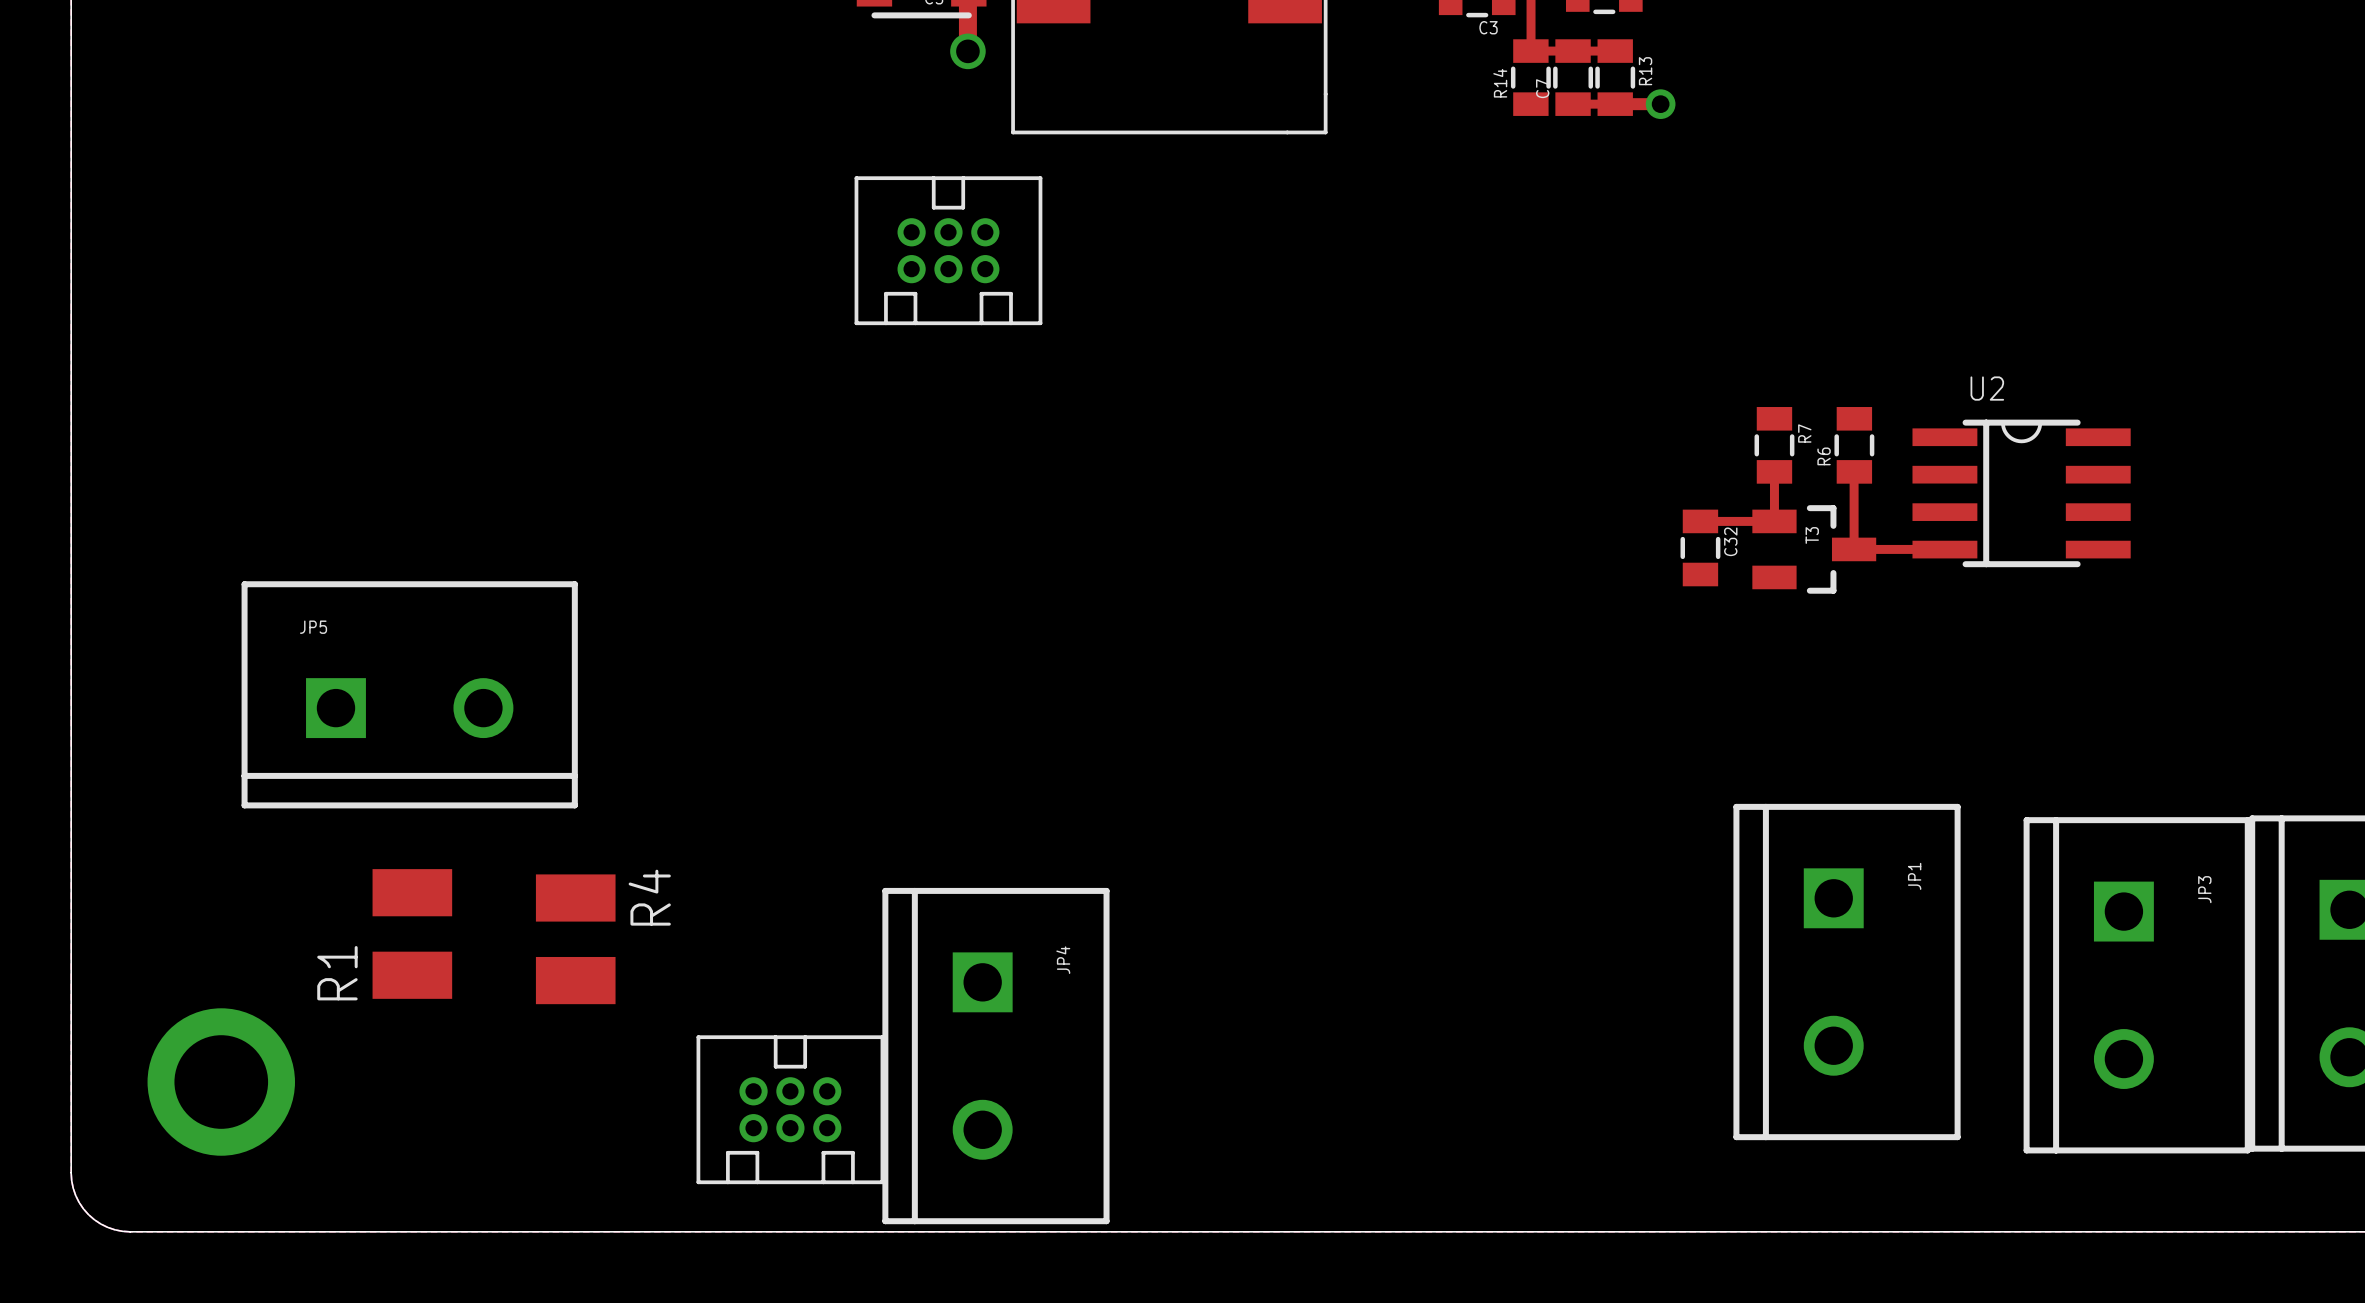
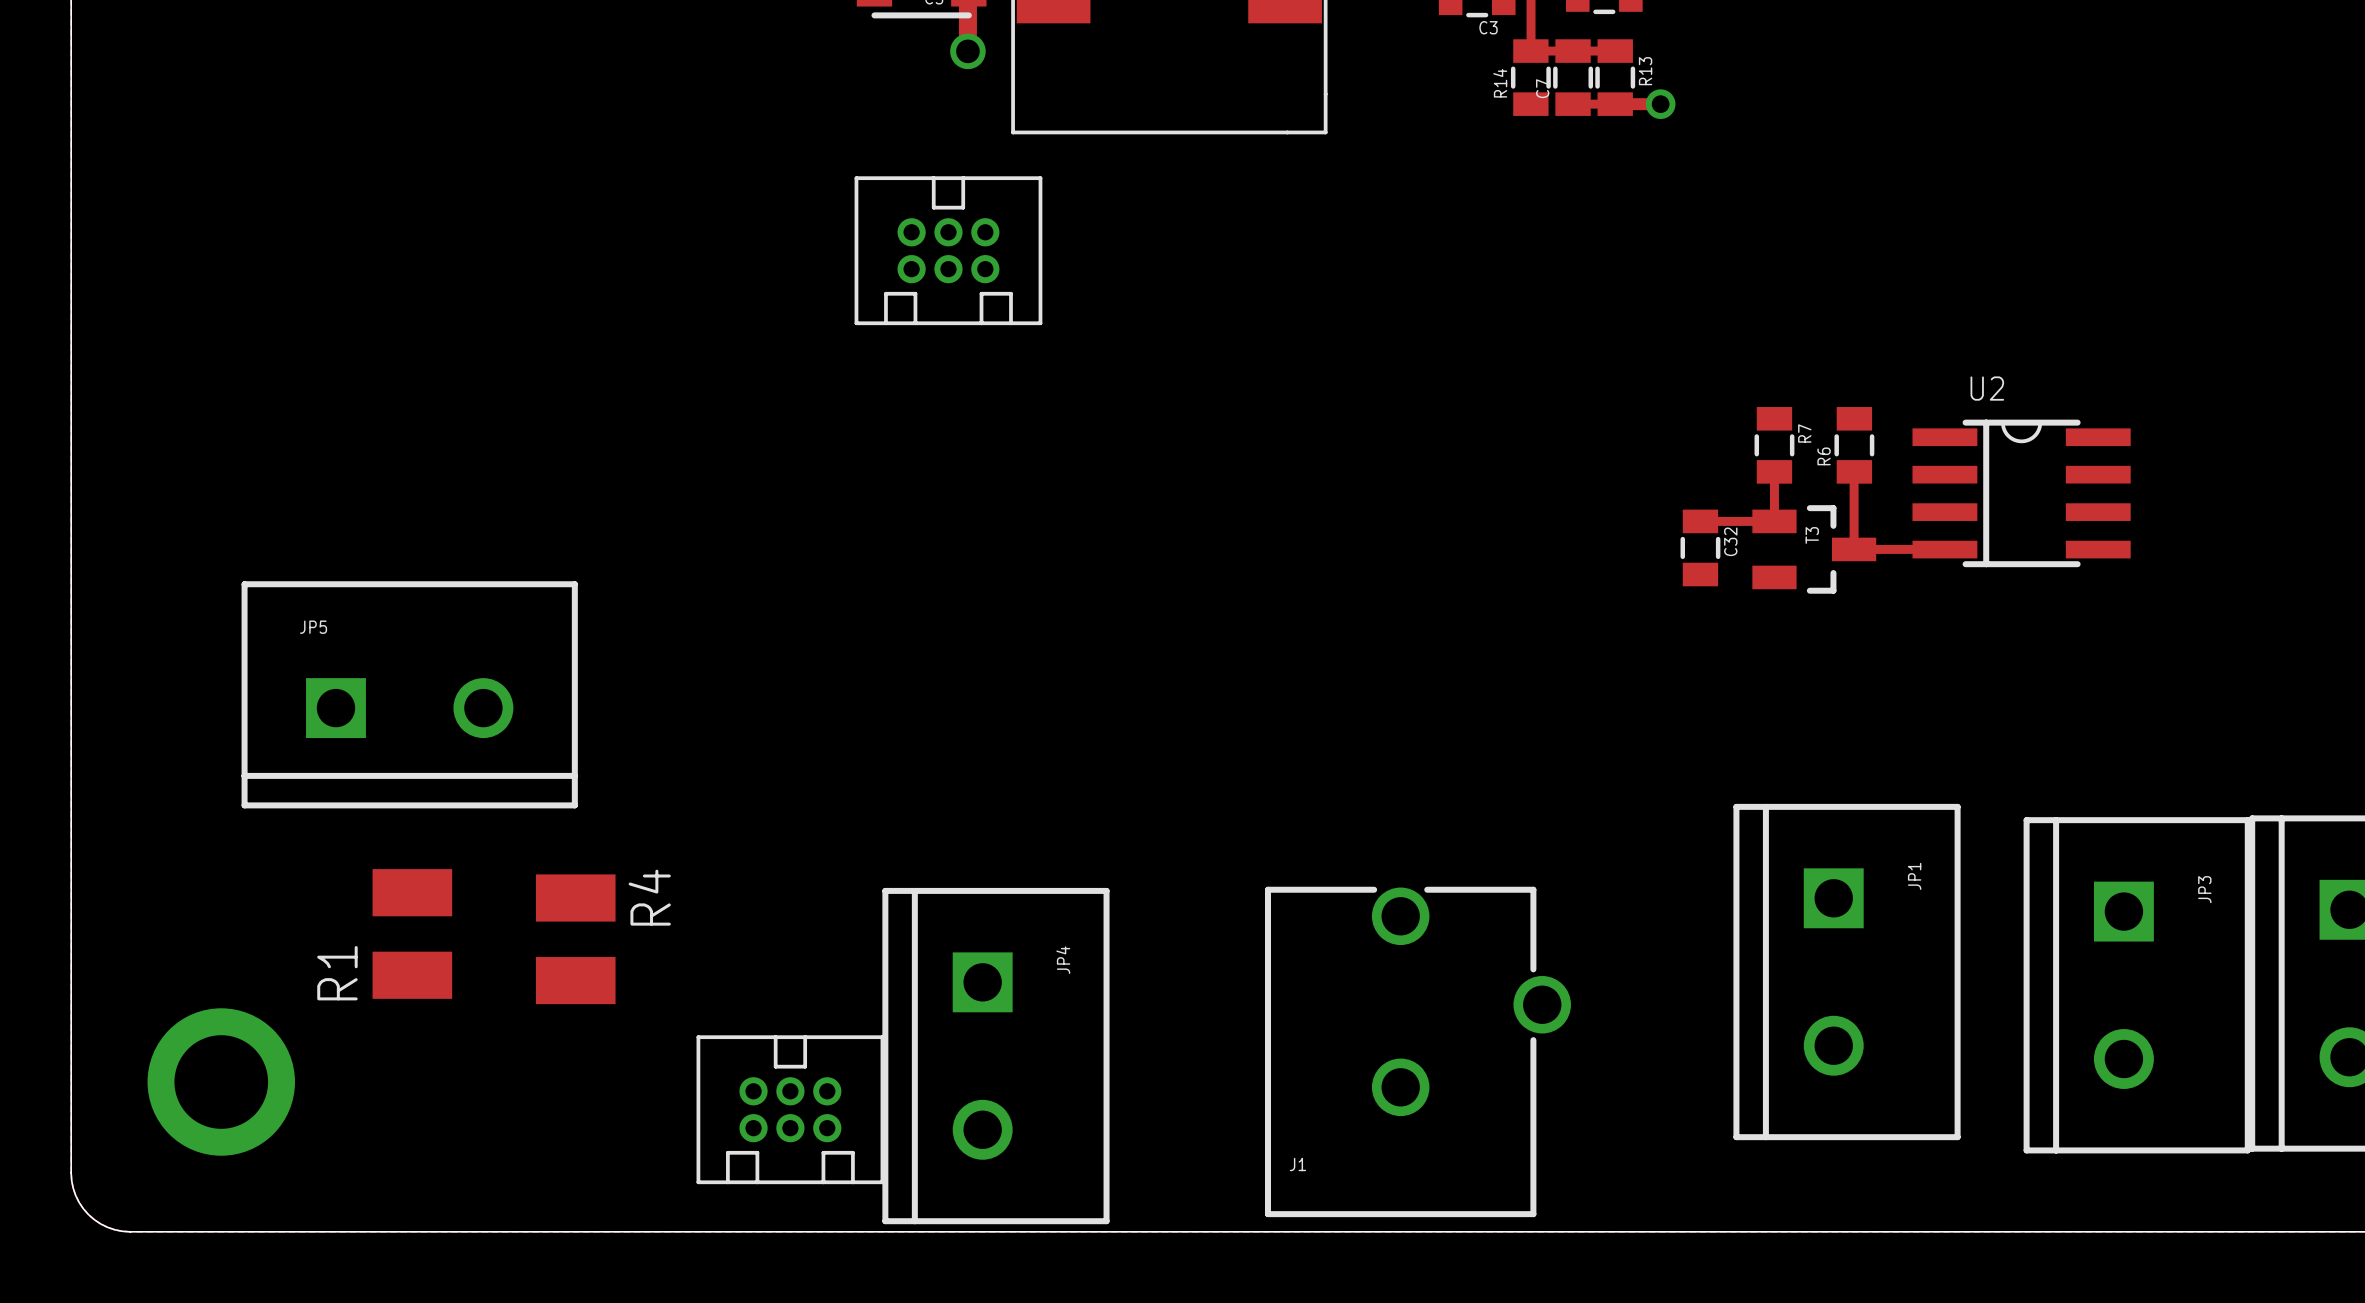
J1: none -> (1417, 1051)

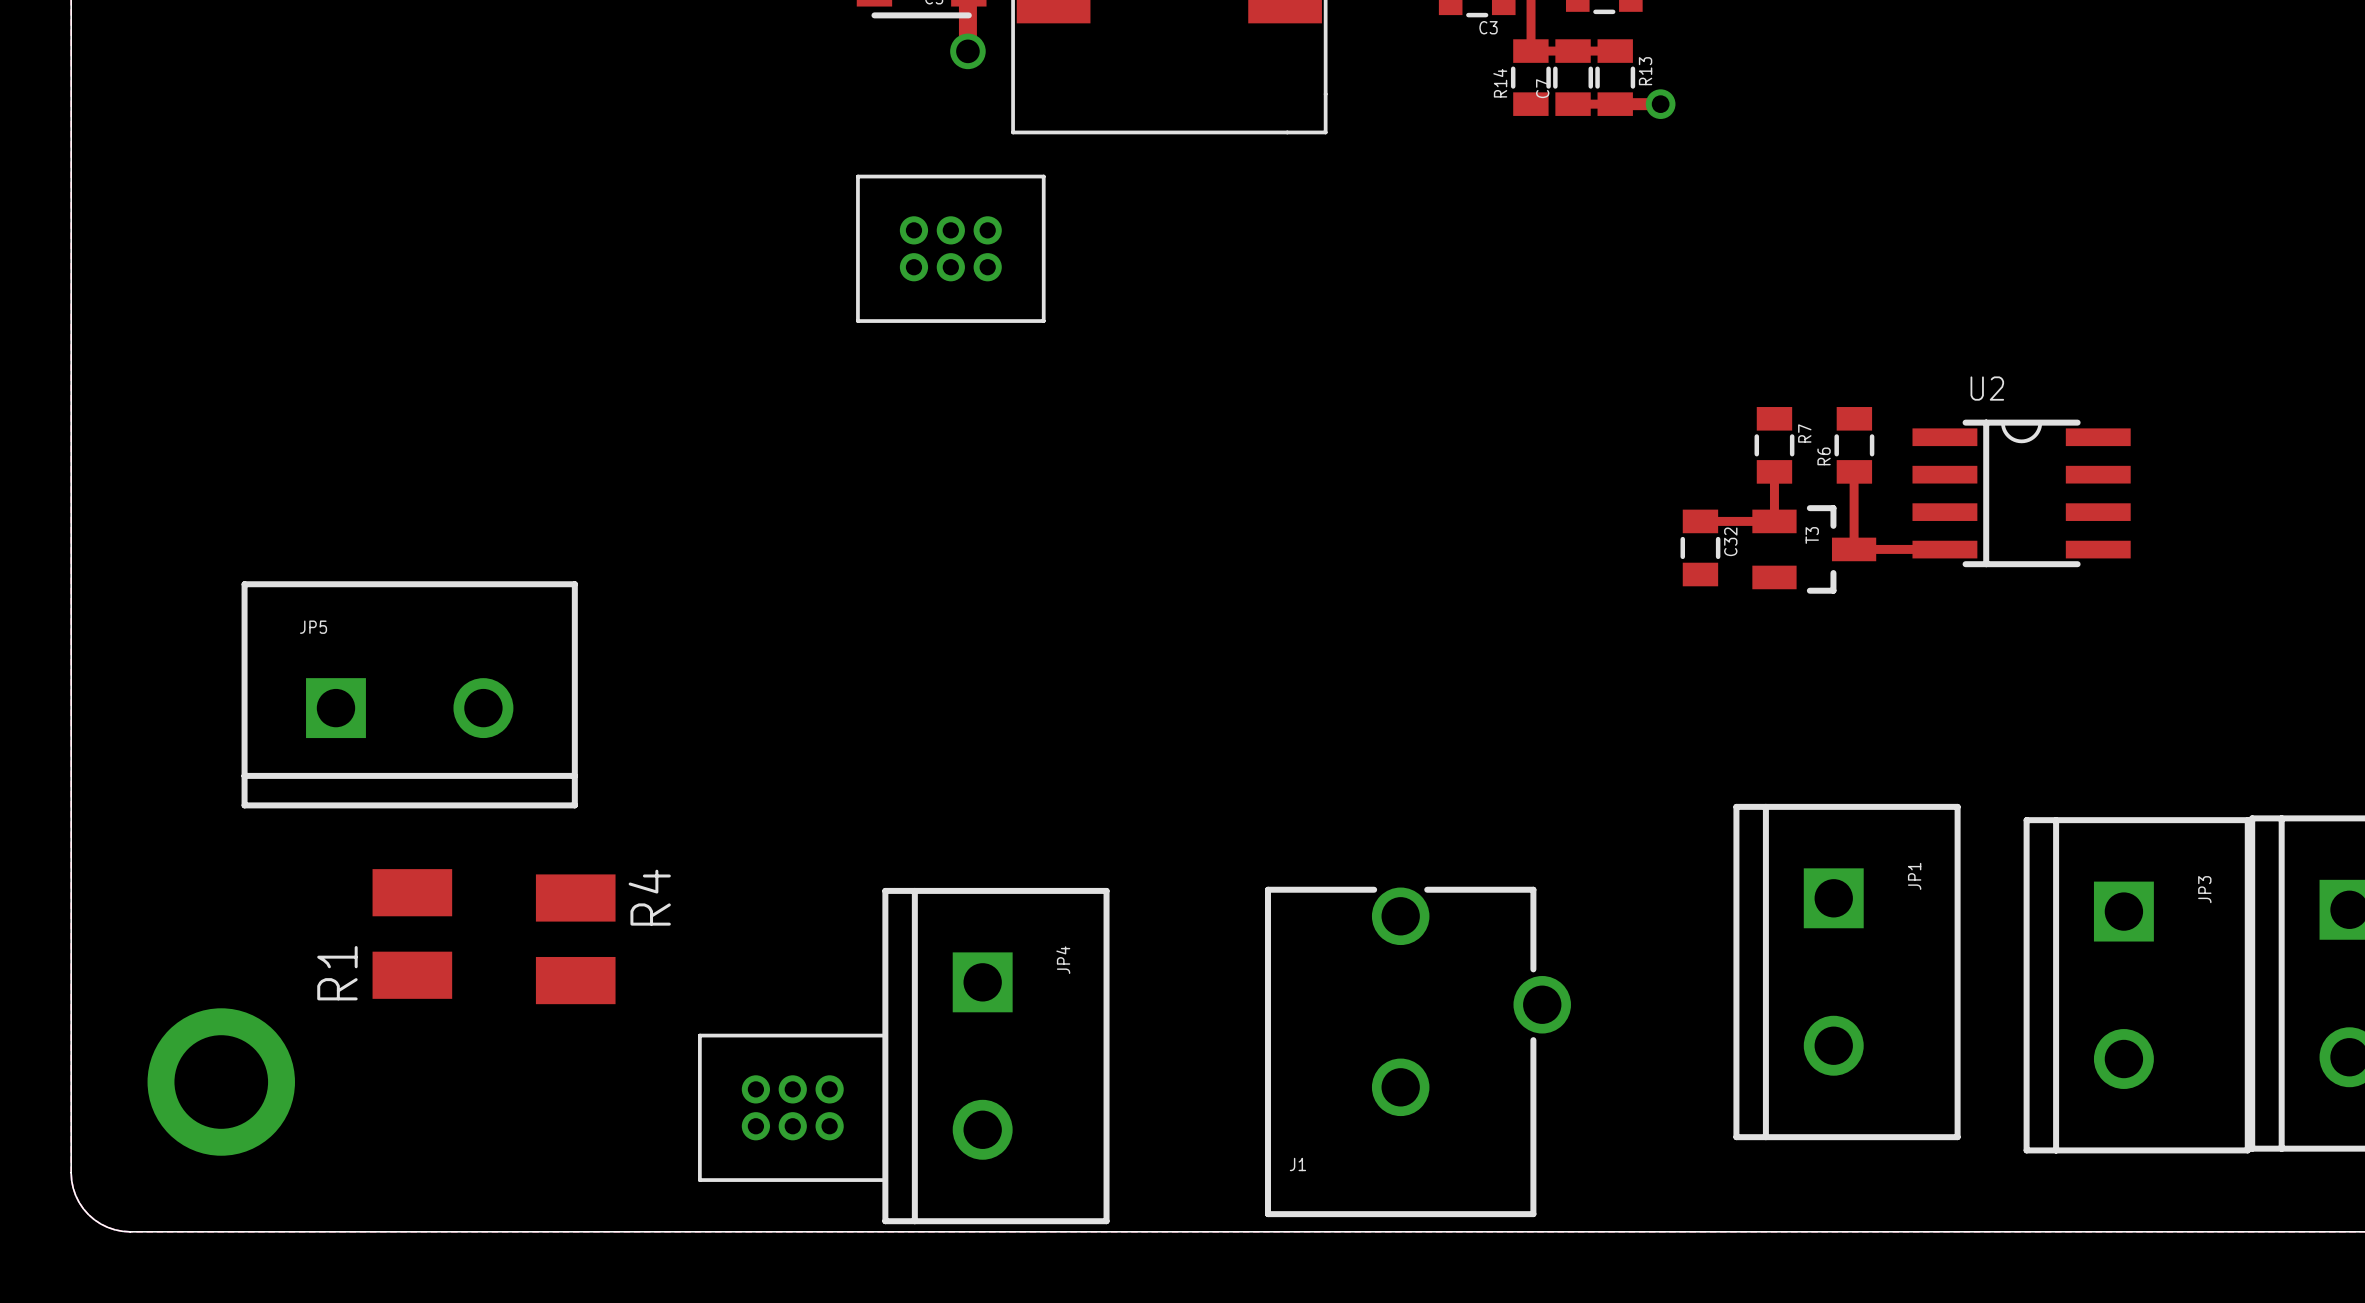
part footprint: [854, 176, 1043, 326] -> [856, 174, 1046, 323]
part footprint: [696, 1035, 885, 1185] -> [698, 1033, 888, 1182]

